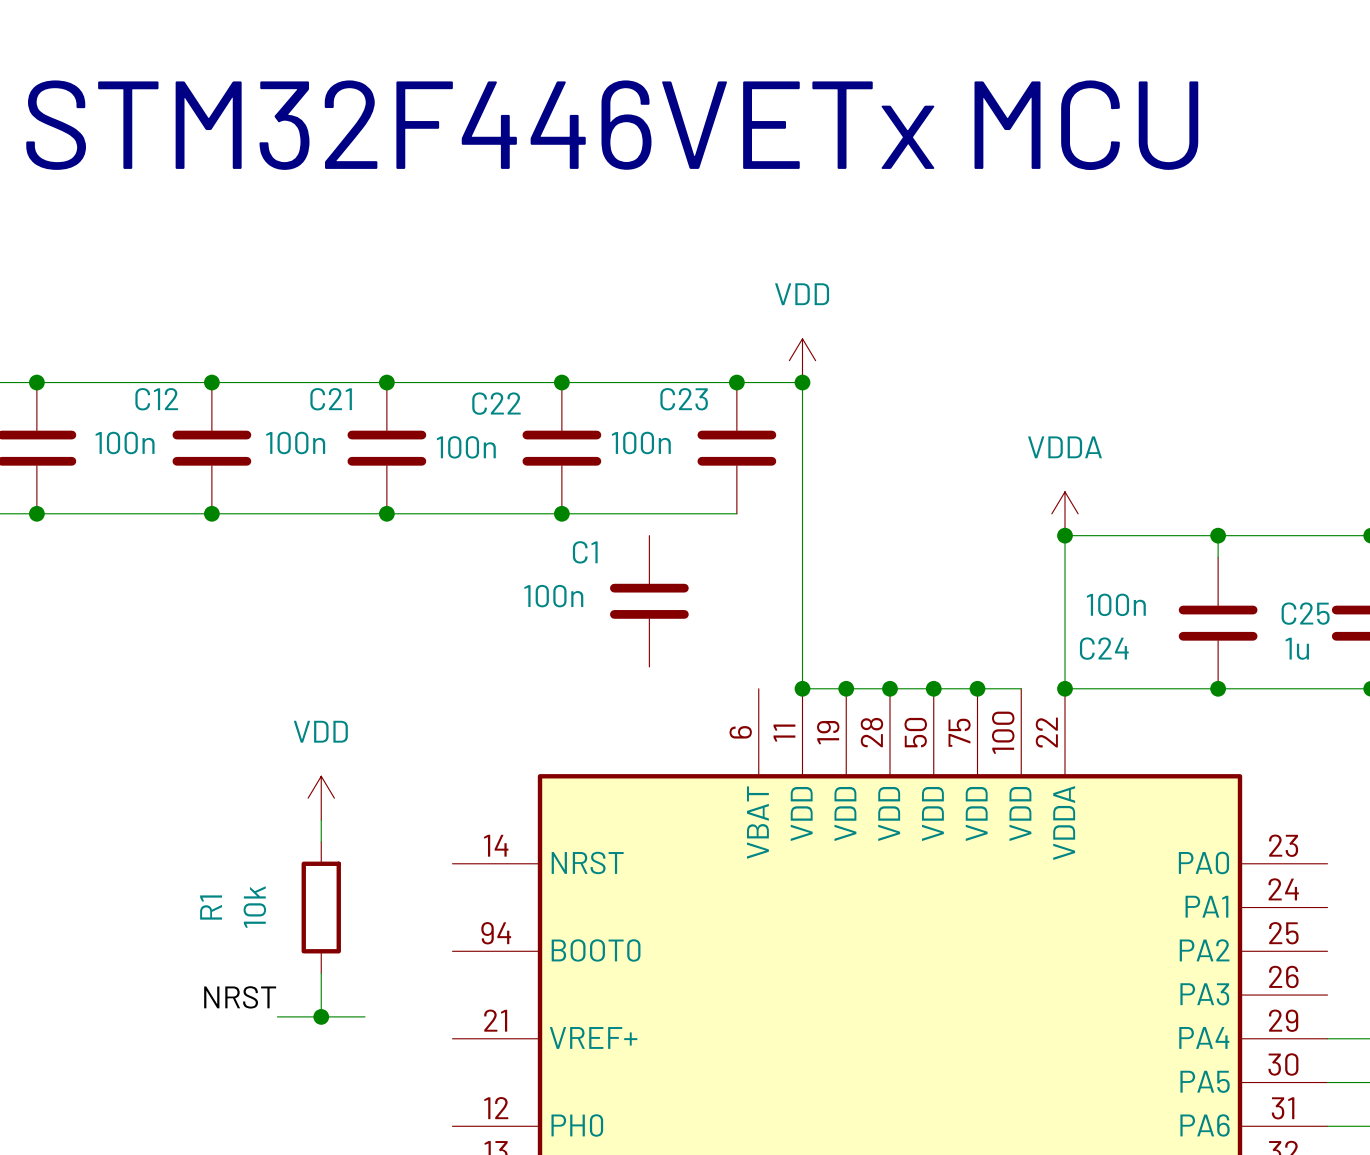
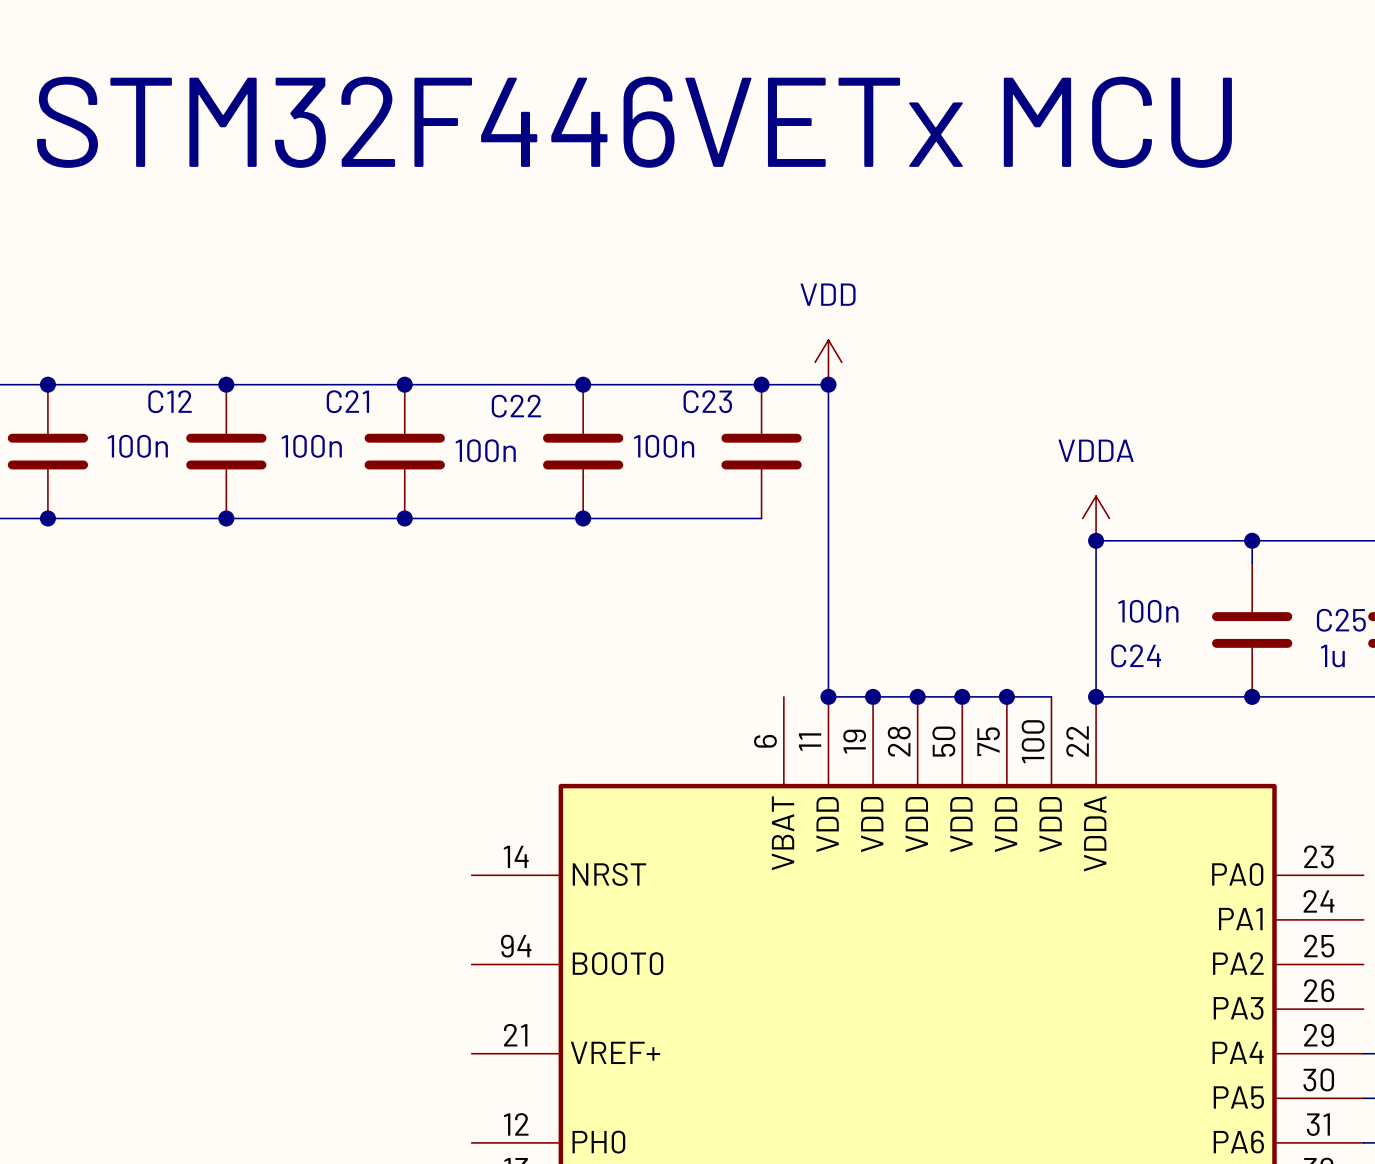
C1: 100n (649, 601) -> none
power symbol: VDD (321, 798) -> none
wire: (321, 820) (321, 841) -> none
R1: 10k (321, 907) -> none
wire: (321, 973) (321, 1016) -> none
label: NRST (240, 997) -> none
wire: (277, 1016) (365, 1016) -> none
junction: (321, 1016) -> none

